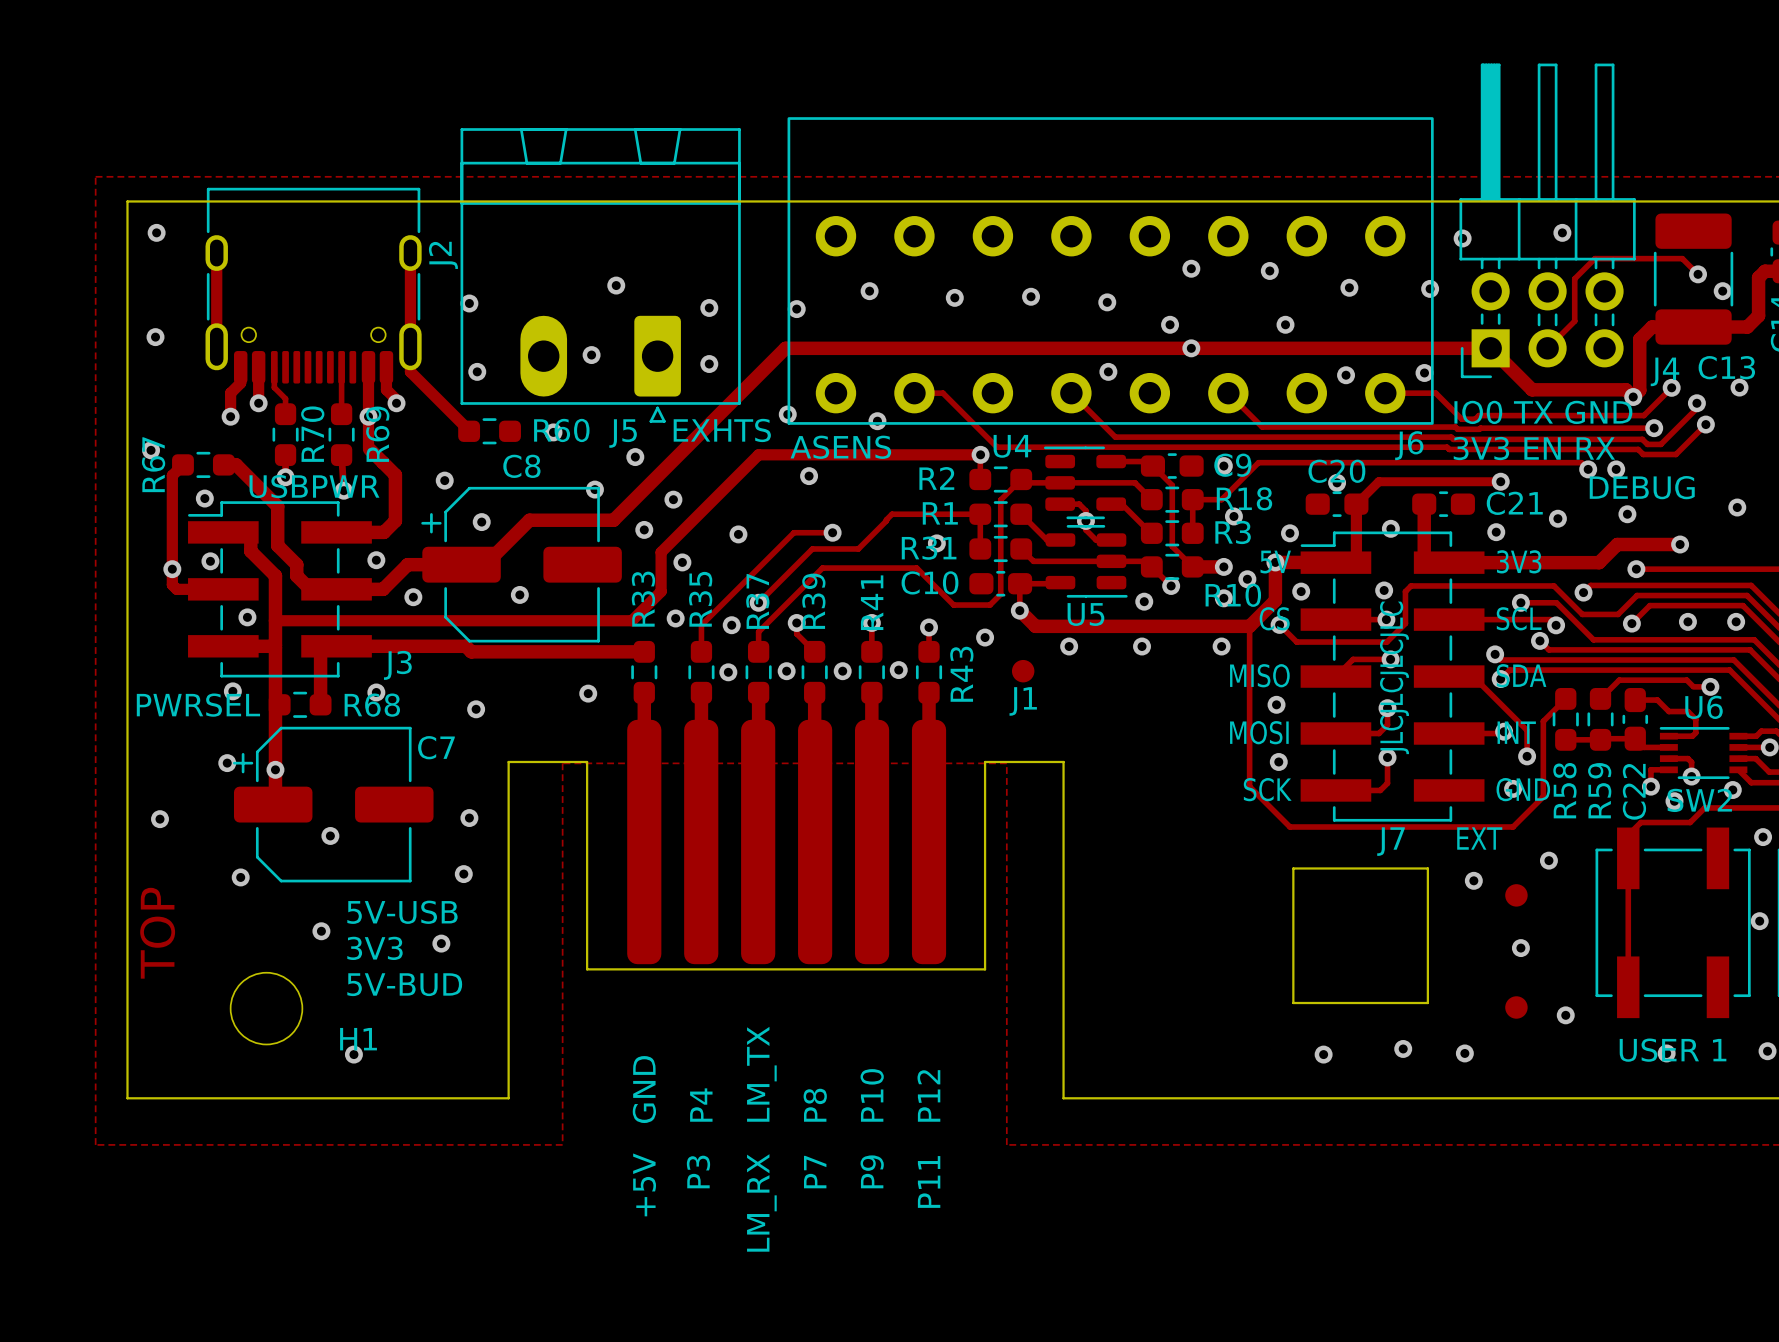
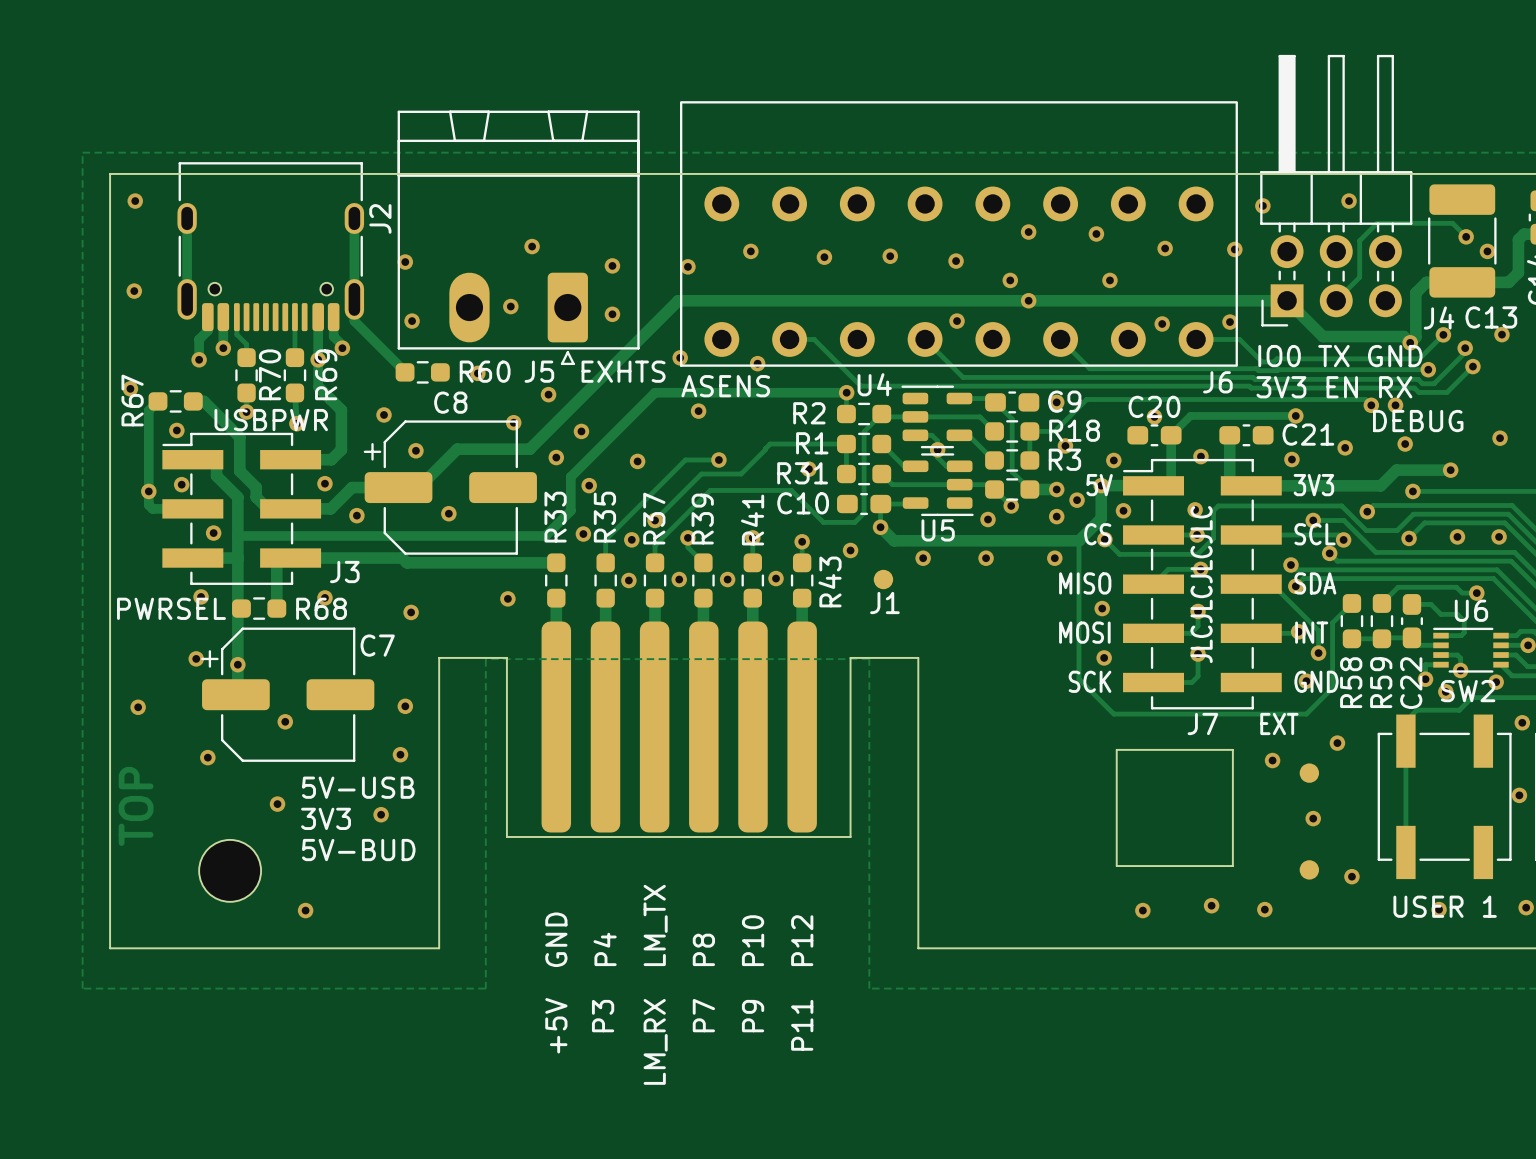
R10 name: R10 (1233, 595) -> none
H1 name: H1 (358, 1039) -> none

